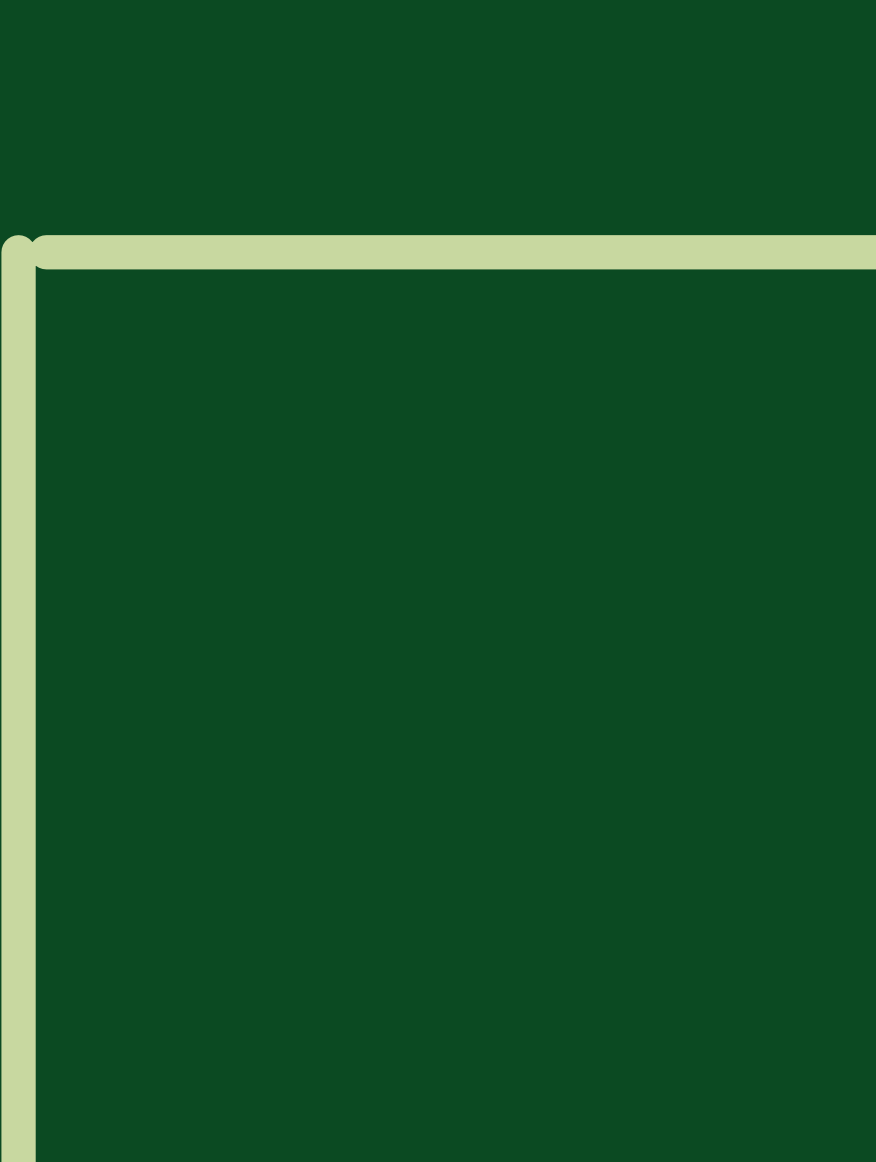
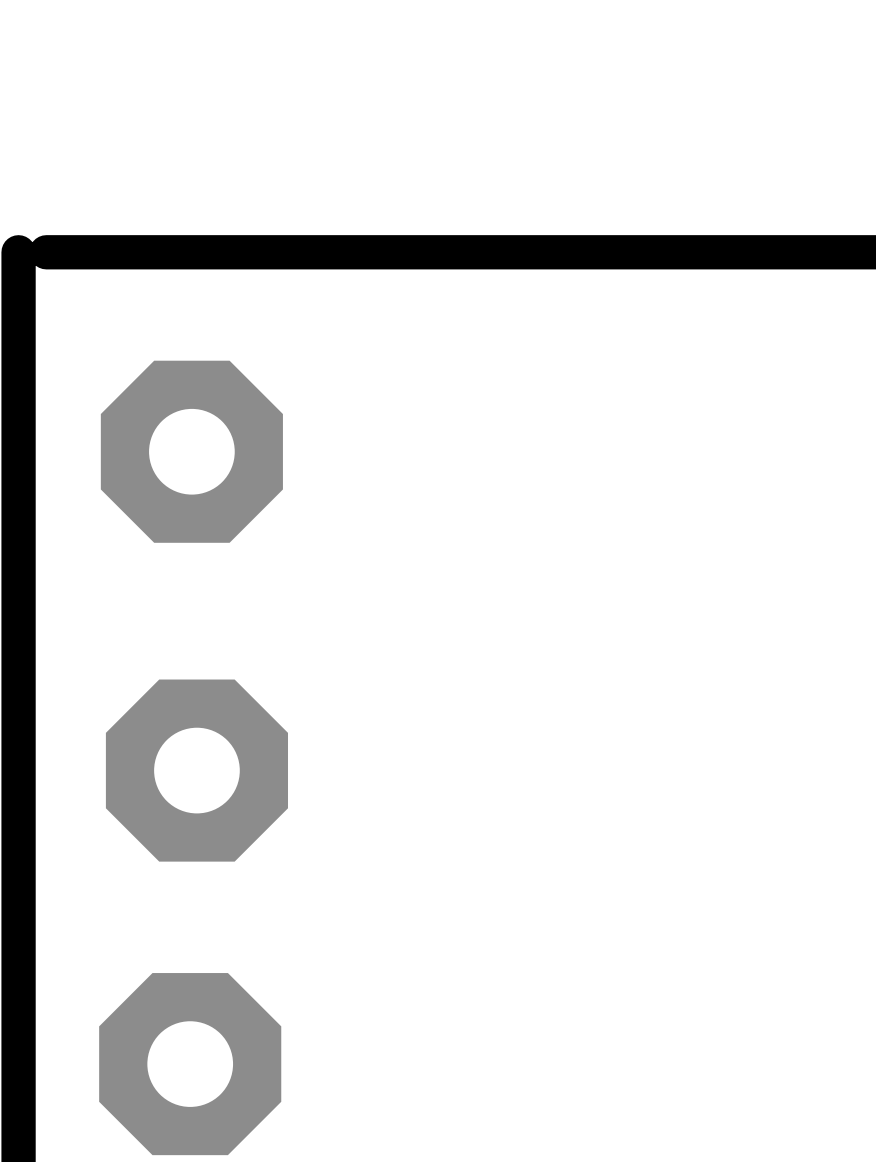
part: none -> (191, 451)
part: none -> (196, 770)
part: none -> (190, 1064)

